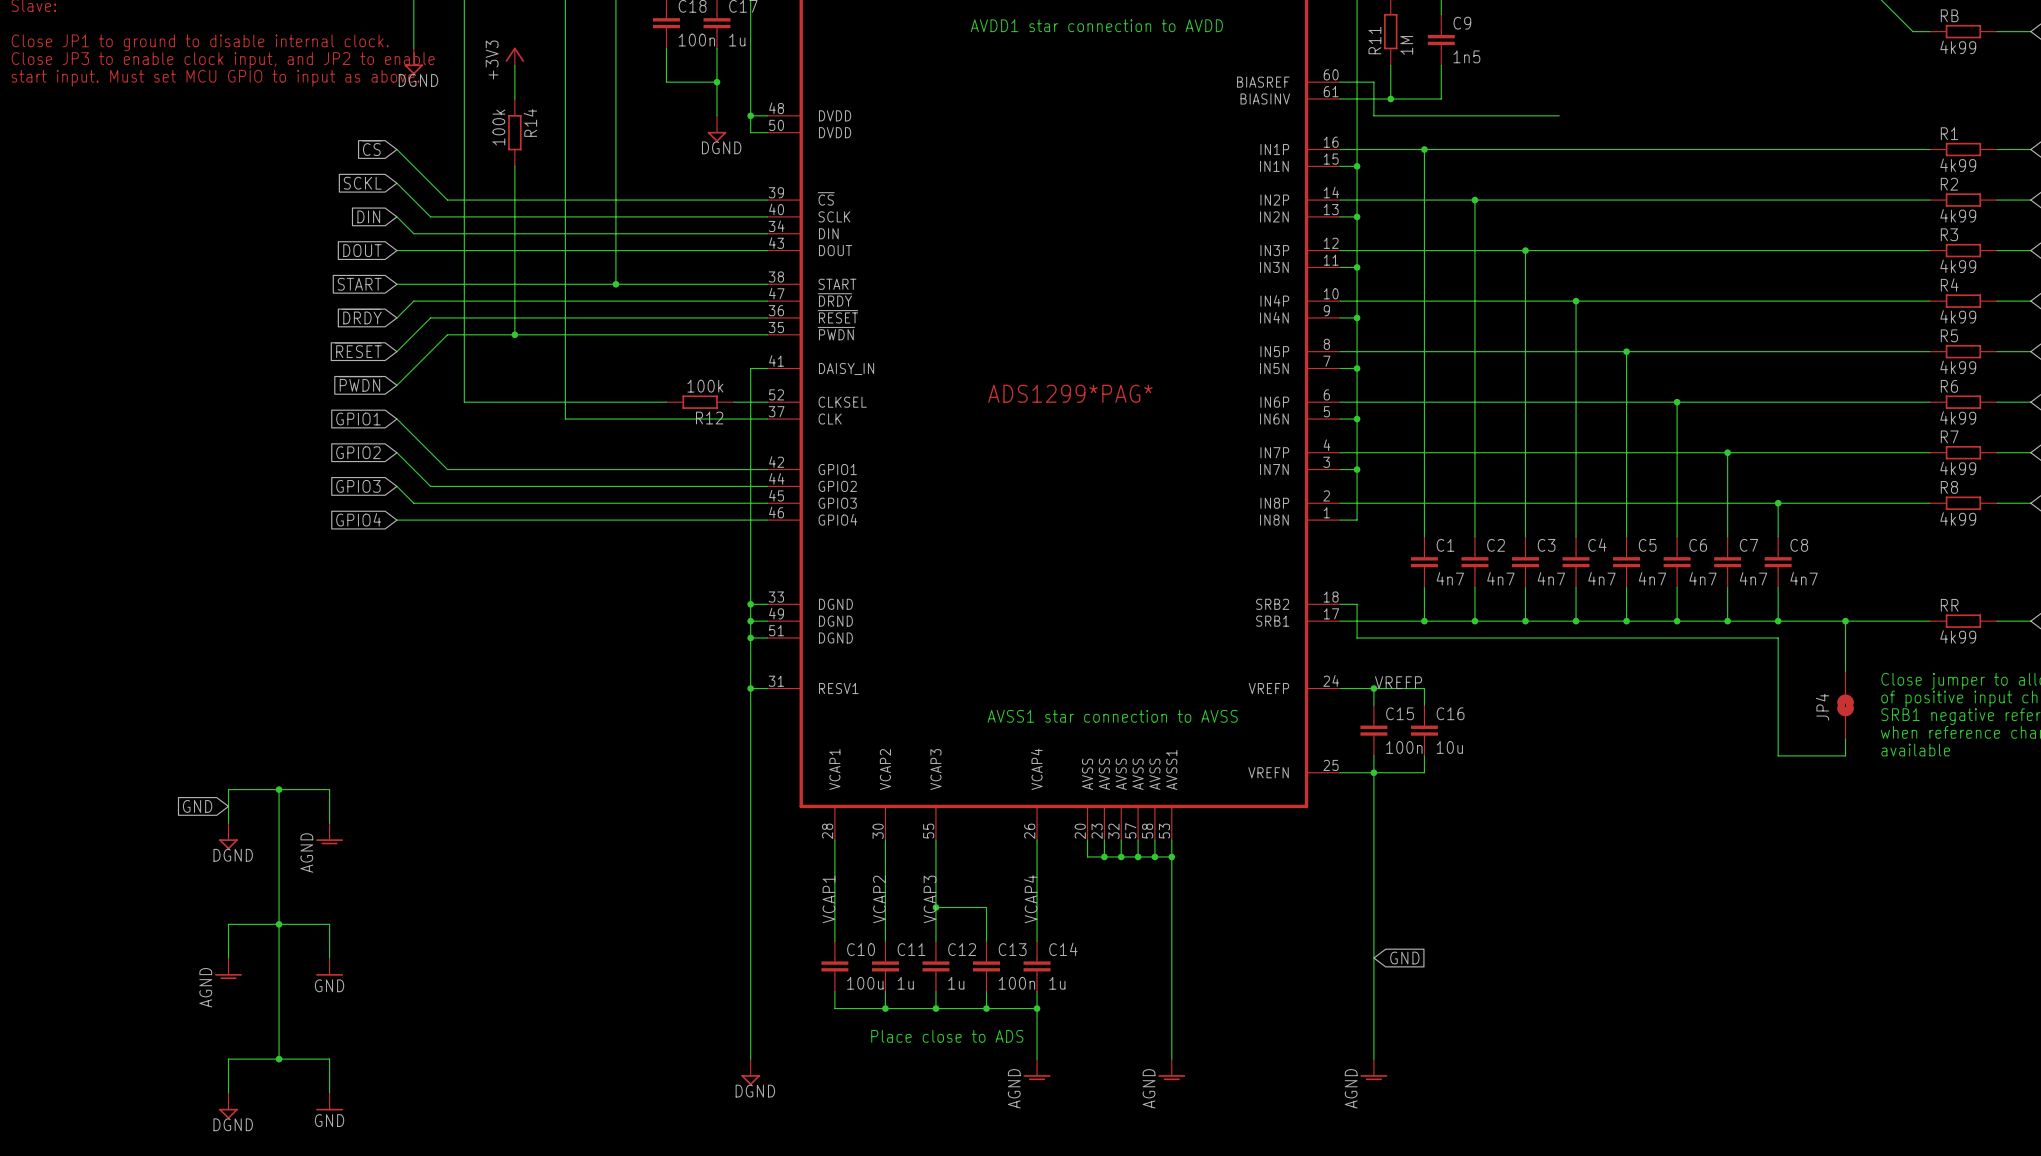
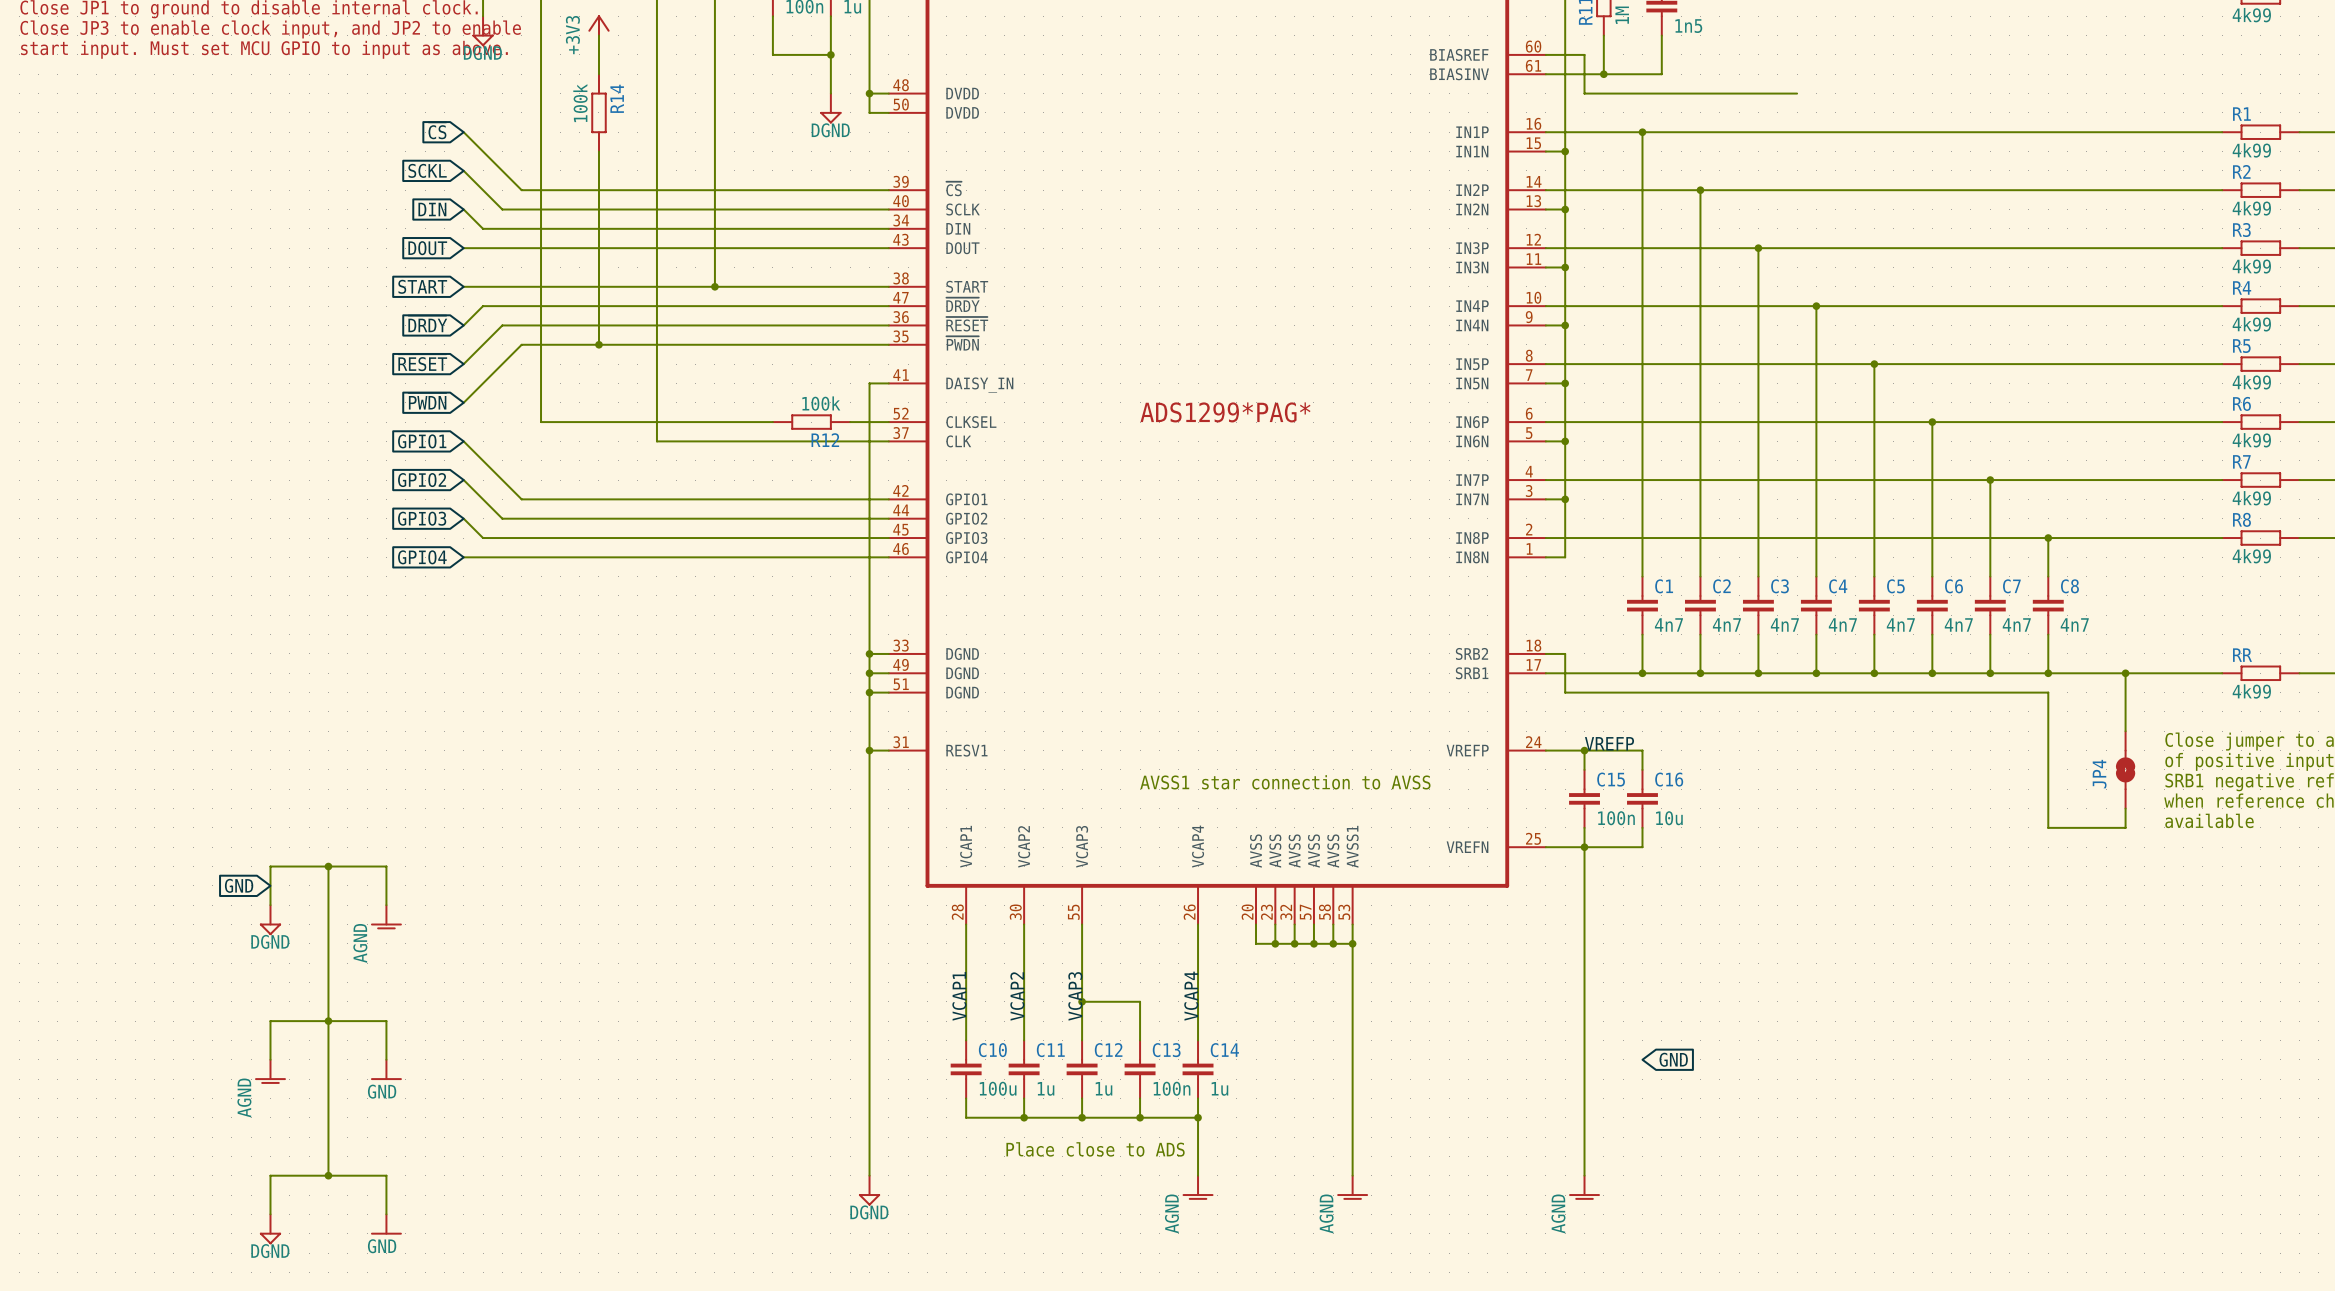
global label position: GND (1404, 958) -> GND (1673, 1059)

